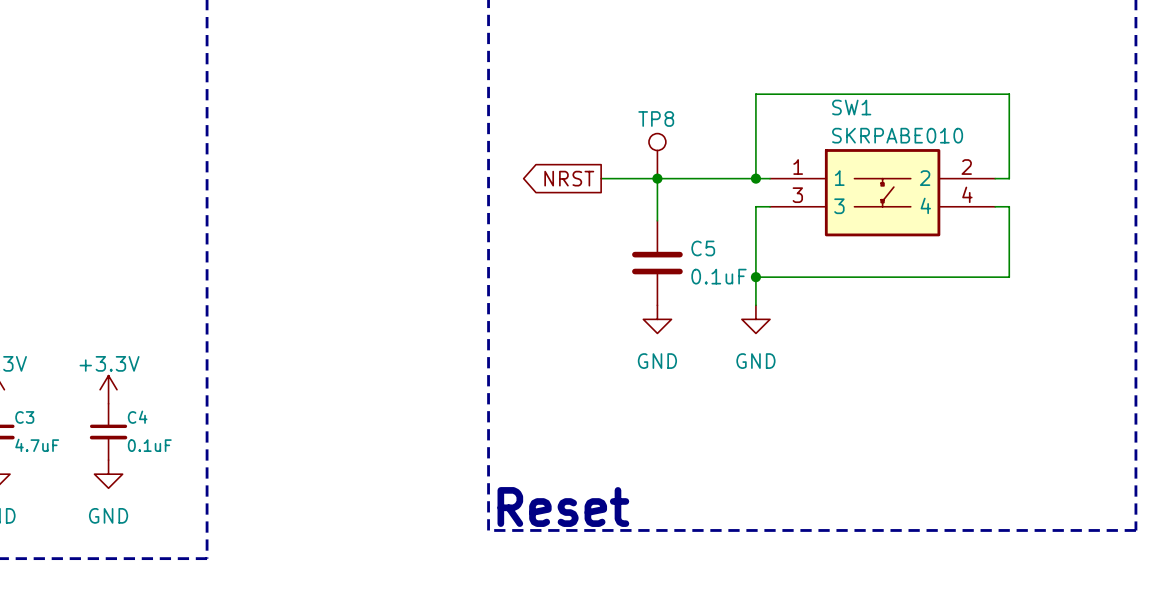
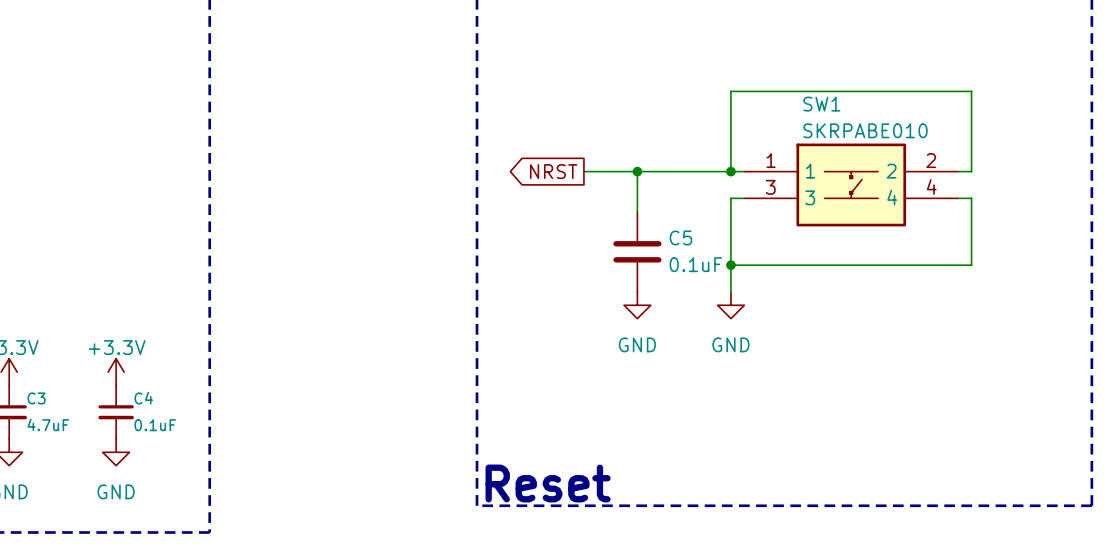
TP8: (657, 156) -> none

